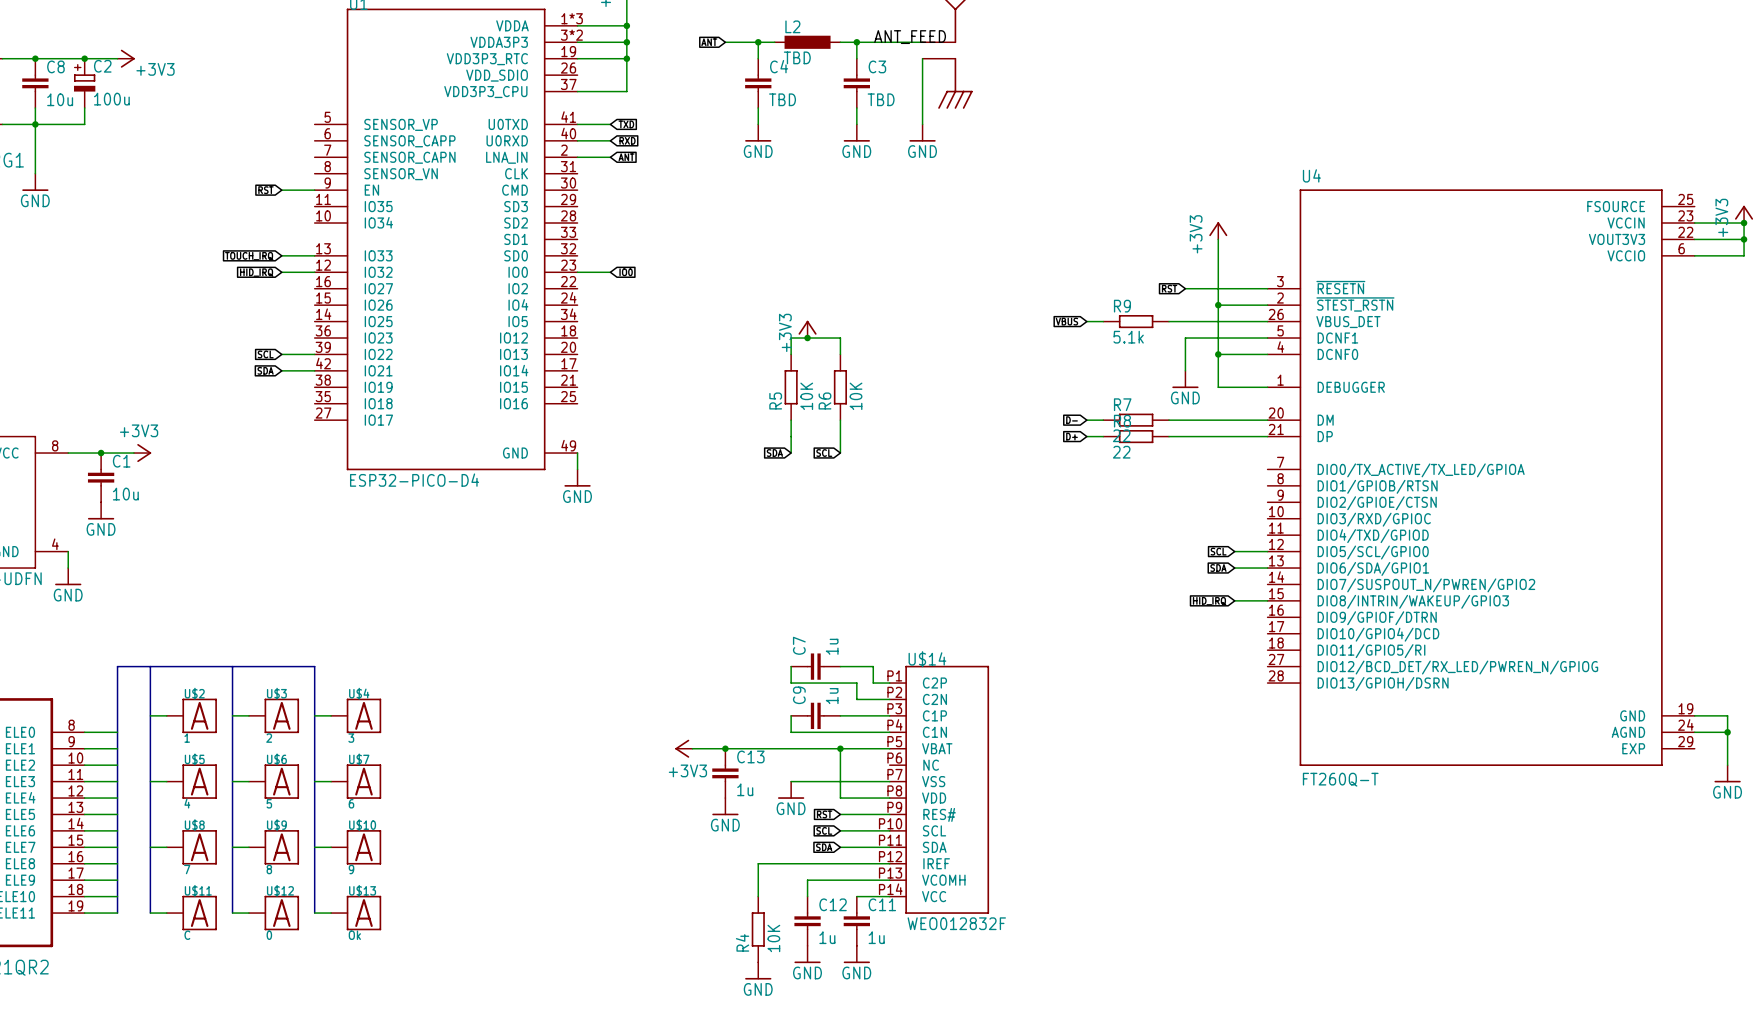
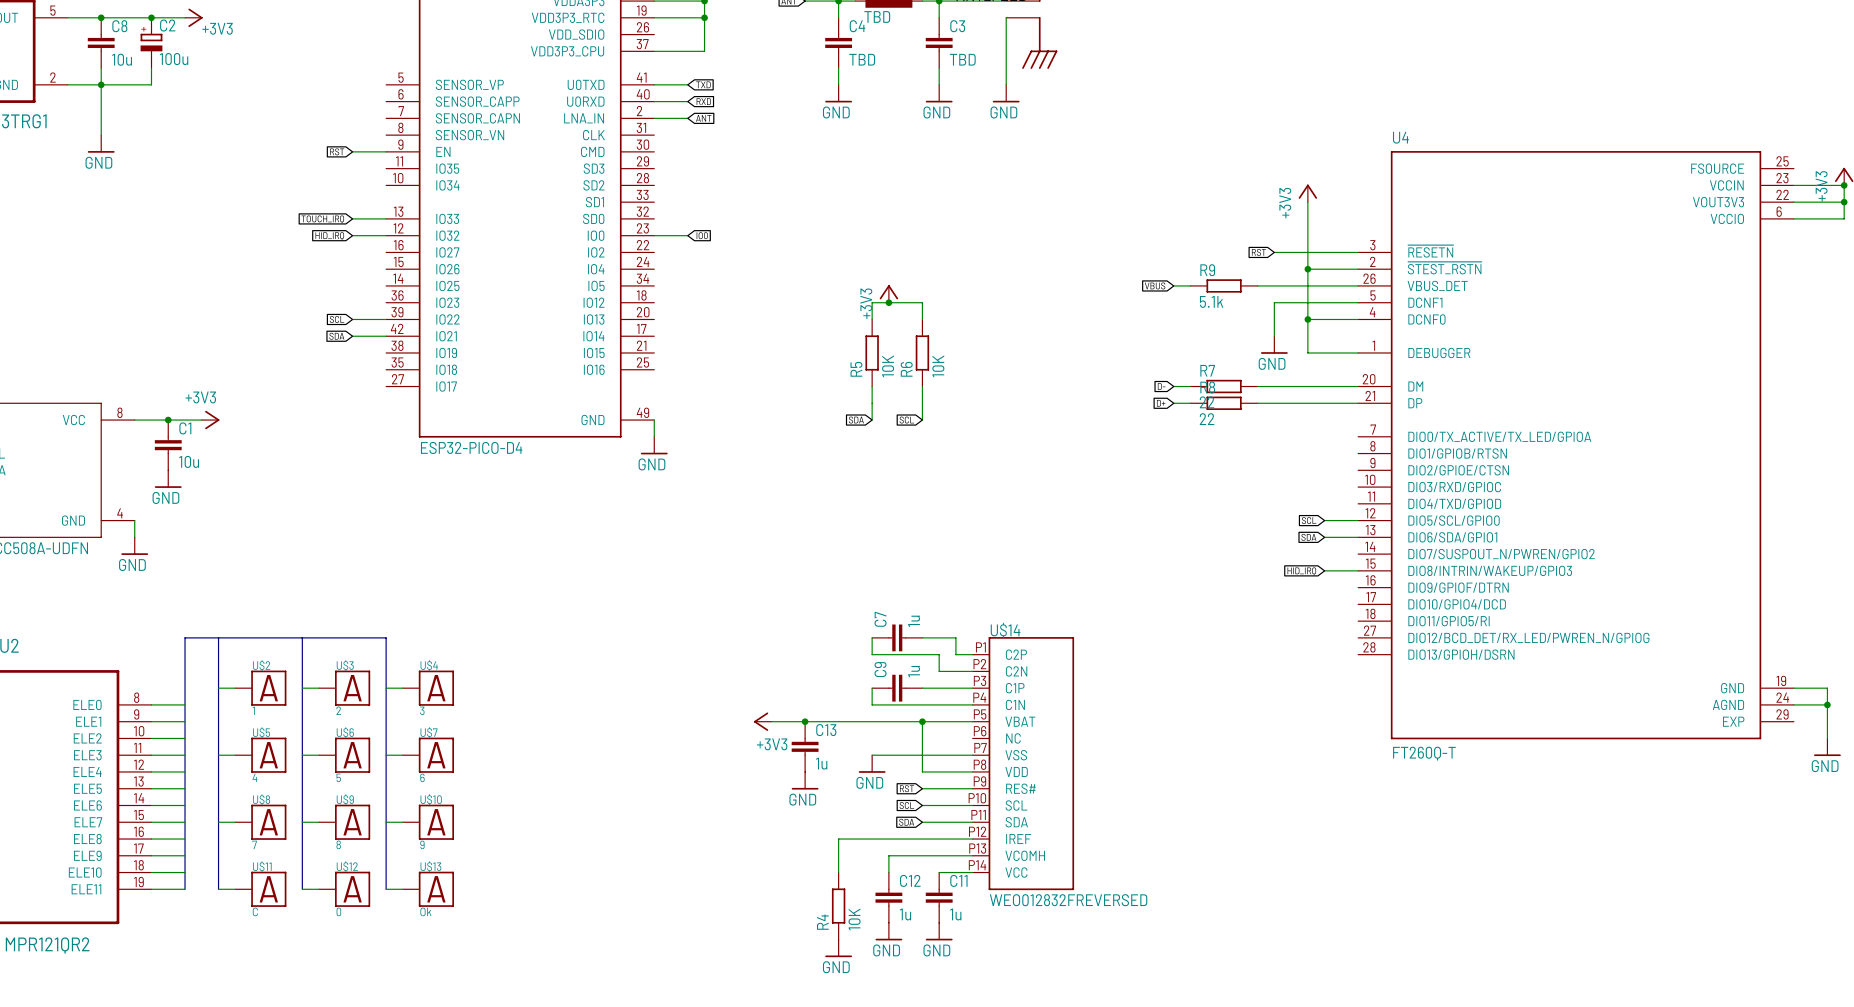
U$14 value: WEO012832F (956, 923) -> WEO012832FREVERSED (1068, 900)

